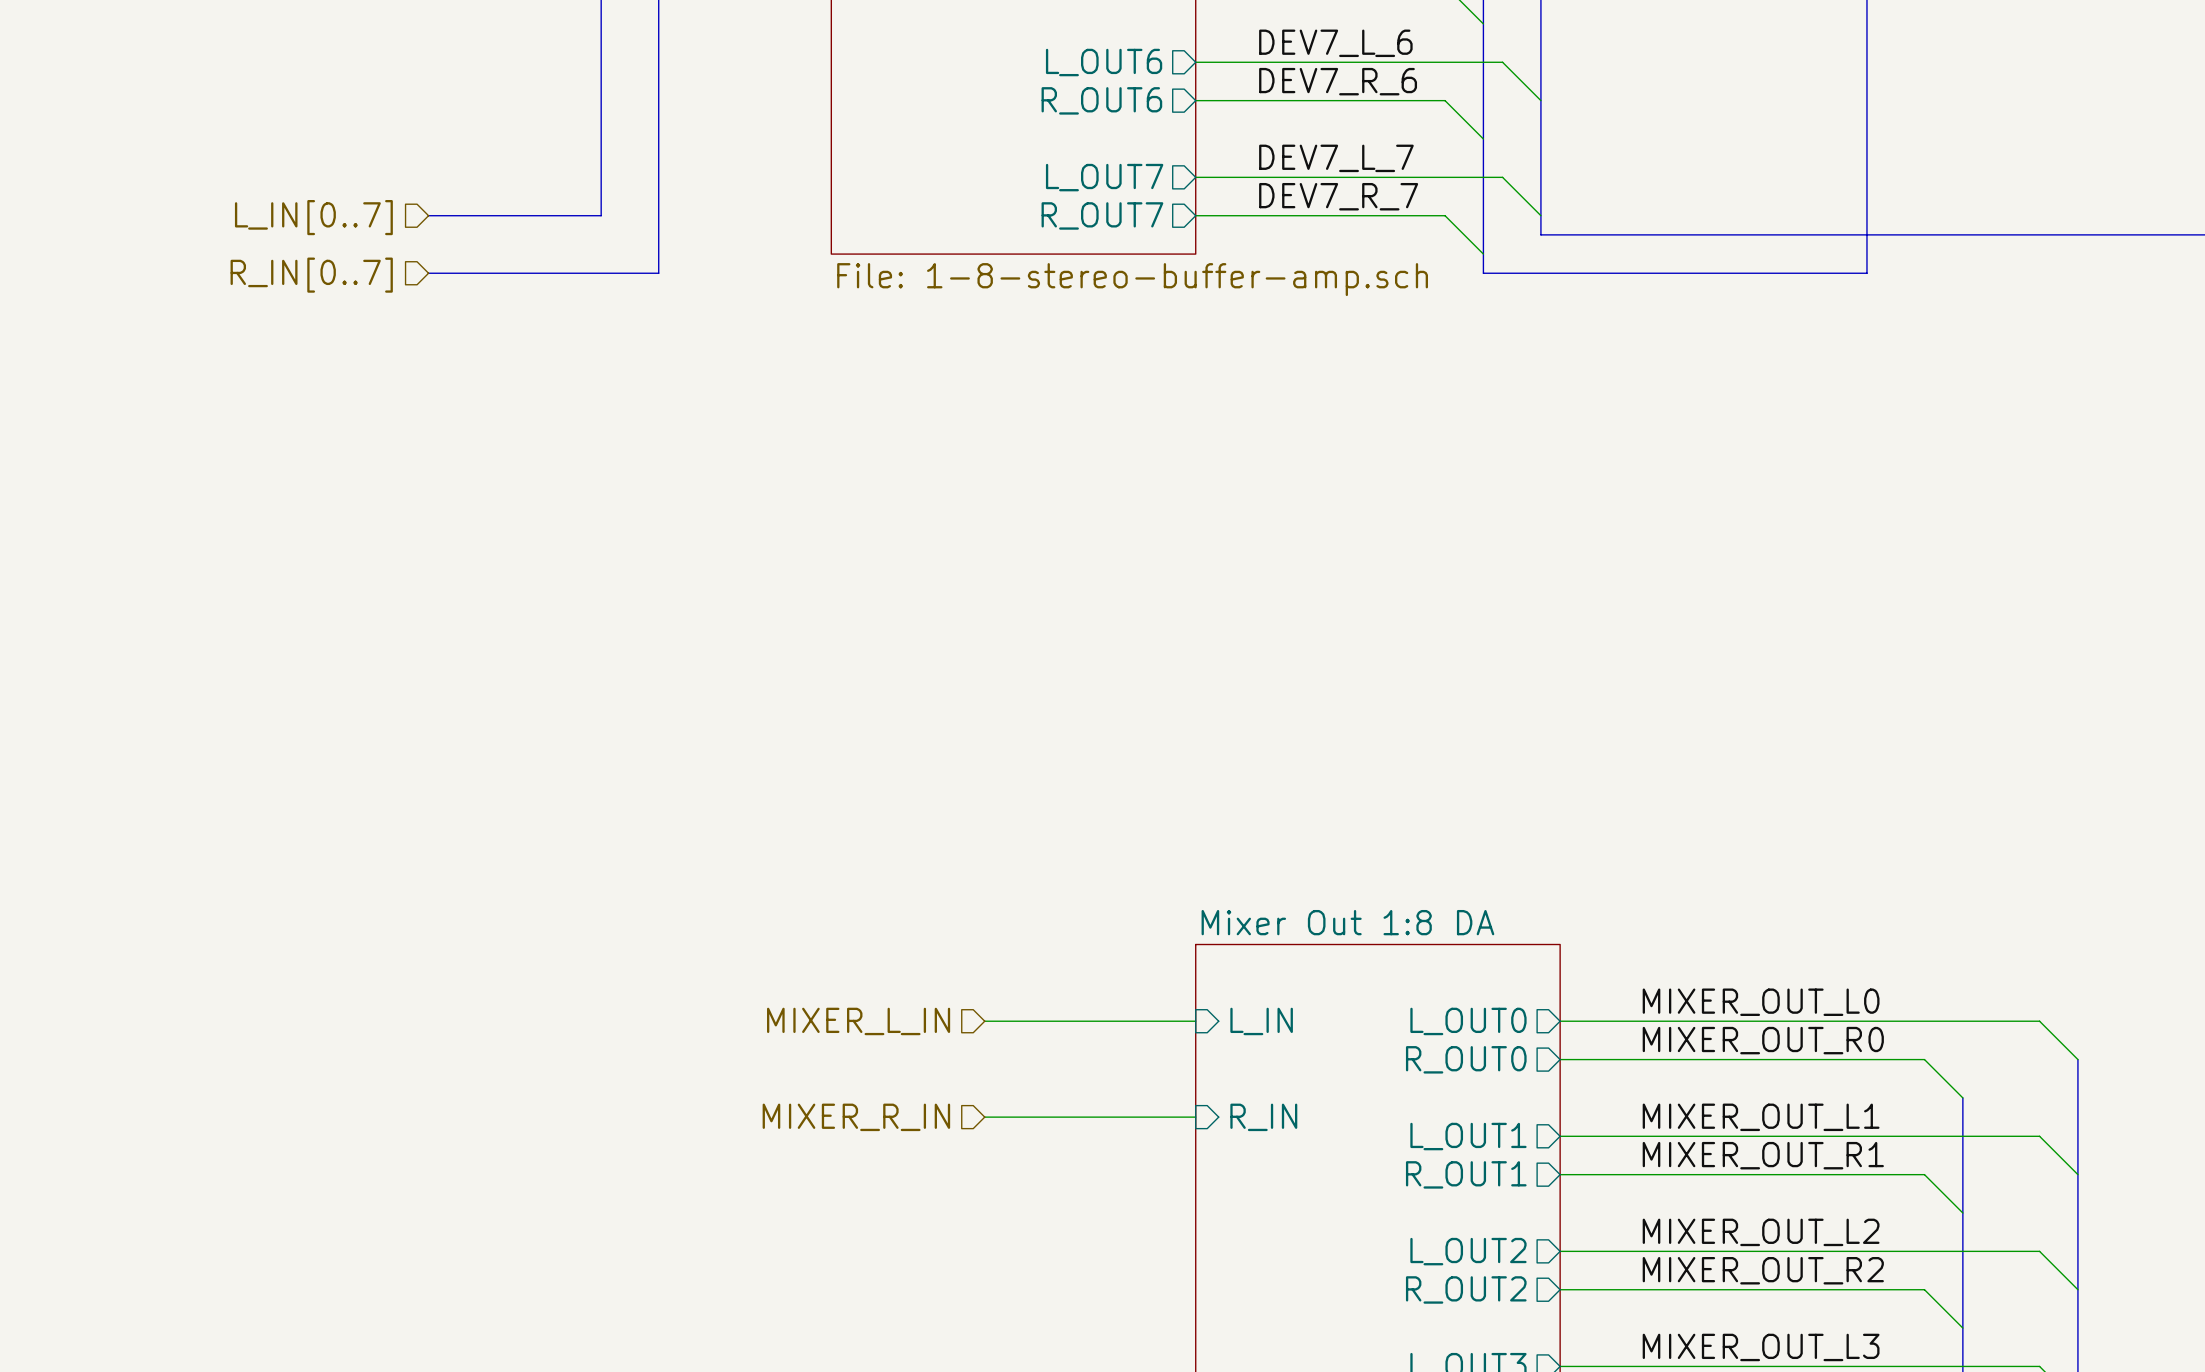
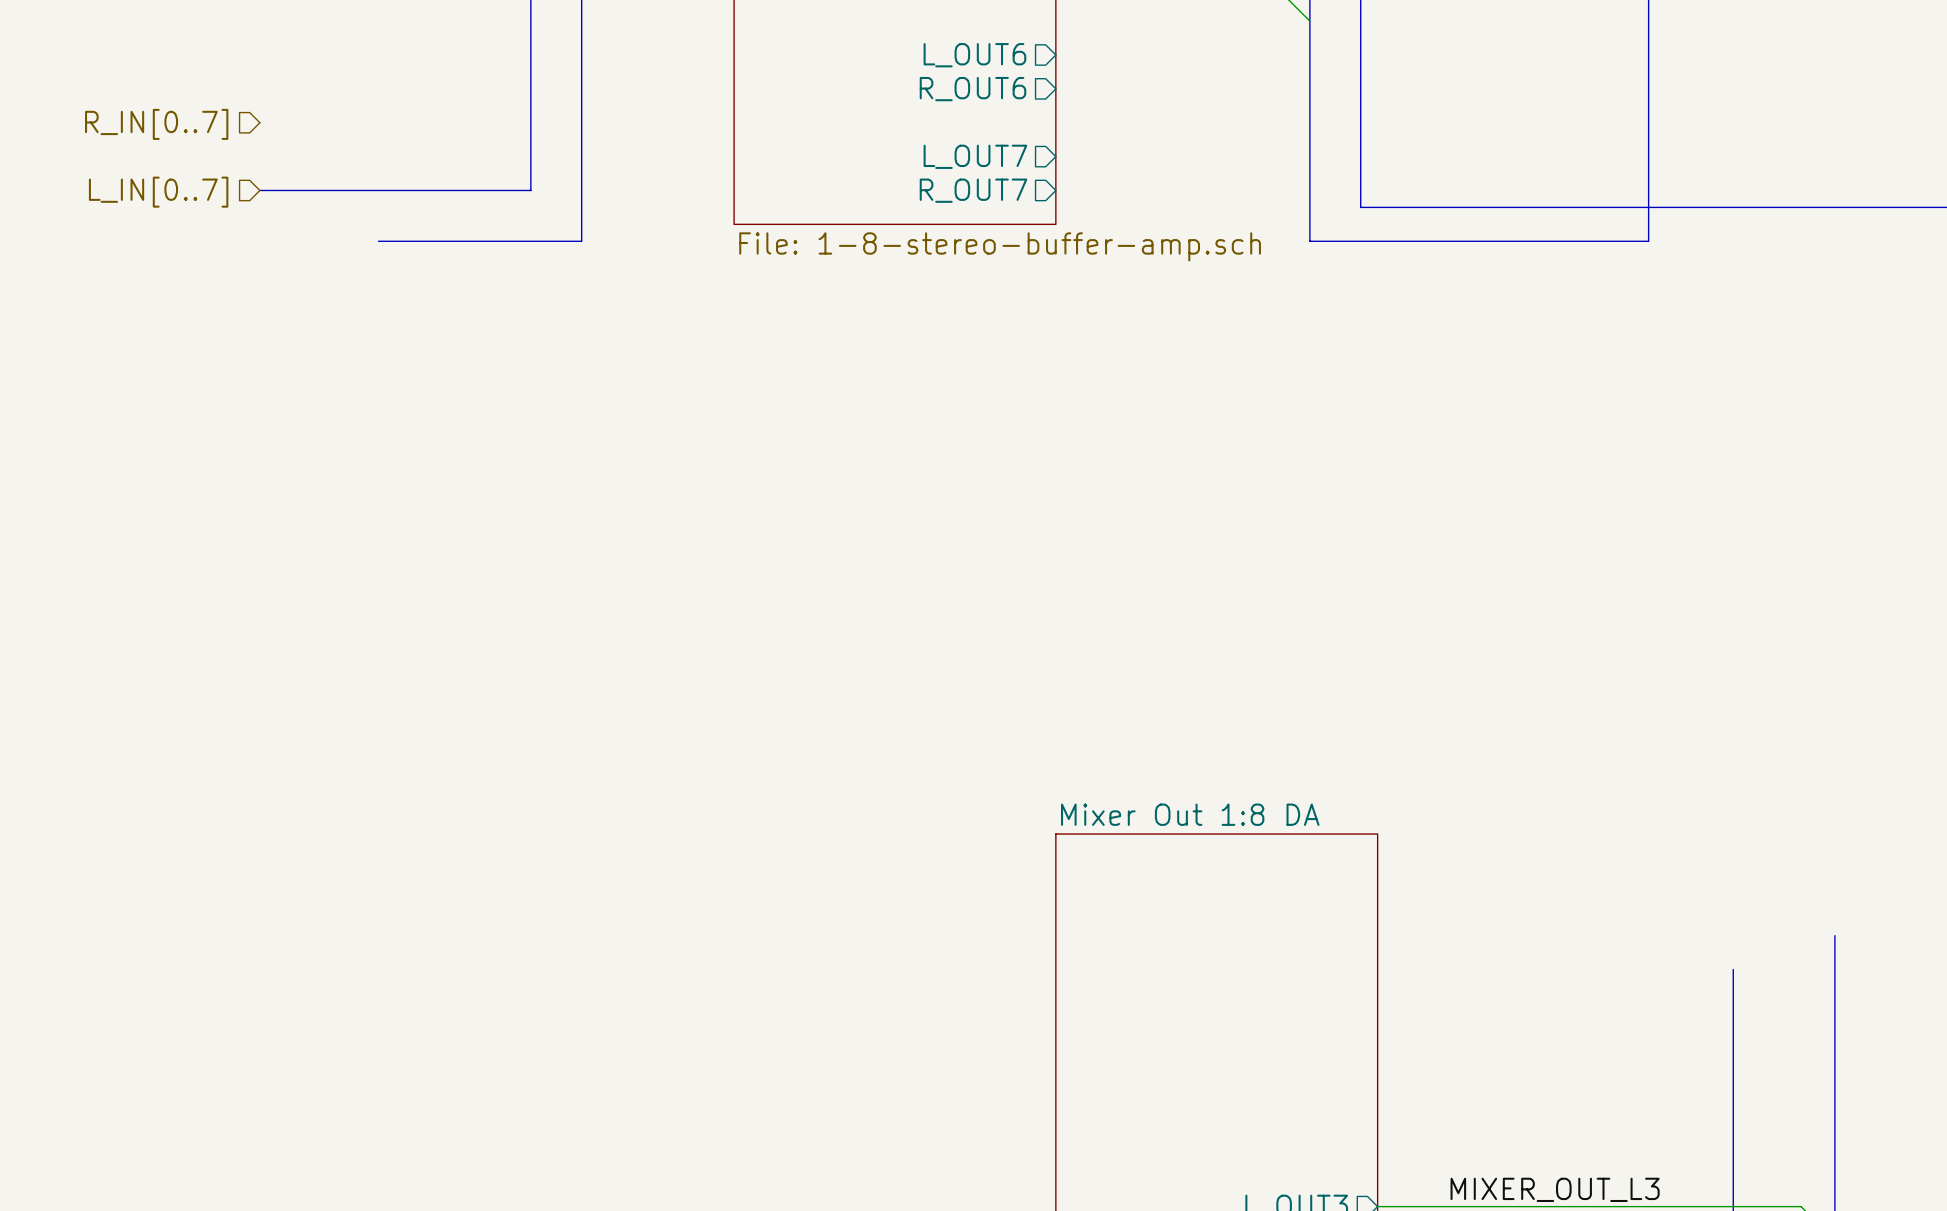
label: DEV7_L_6 (1335, 43) -> none
wire: (1195, 62) (1502, 62) (1540, 100) -> none
label: DEV7_R_6 (1338, 81) -> none
wire: (1195, 100) (1445, 100) (1483, 138) -> none
label: DEV7_L_7 (1336, 158) -> none
wire: (1195, 177) (1502, 177) (1540, 215) -> none
label: DEV7_R_7 (1338, 196) -> none
bus: none -> (259, 190) (378, 190)
wire: (1195, 215) (1445, 215) (1483, 254) -> none
hierarchical label position: L_IN[0..7] (313, 217) -> L_IN[0..7] (158, 192)
hierarchical label position: R_IN[0..7] (311, 275) -> R_IN[0..7] (156, 124)
label: MIXER_OUT_L0 (1761, 1002) -> none
hierarchical label: MIXER_L_IN (858, 1021) -> none
wire: (984, 1021) (1195, 1021) -> none
sheet pin: L_IN (1261, 1021) -> none
sheet pin: L_OUT0 (1468, 1021) -> none
wire: (1560, 1021) (2039, 1021) (2077, 1059) -> none
label: MIXER_OUT_R0 (1763, 1040) -> none
sheet pin: R_OUT0 (1466, 1059) -> none
wire: (1560, 1059) (1924, 1059) (1962, 1097) -> none
hierarchical label: MIXER_R_IN (856, 1117) -> none
wire: (984, 1117) (1195, 1117) -> none
sheet pin: R_IN (1263, 1117) -> none
label: MIXER_OUT_L1 (1761, 1117) -> none
sheet pin: L_OUT1 (1468, 1136) -> none
wire: (1560, 1136) (2039, 1136) (2077, 1174) -> none
label: MIXER_OUT_R1 (1763, 1155) -> none
sheet pin: R_OUT1 (1466, 1174) -> none
wire: (1560, 1174) (1924, 1174) (1962, 1213) -> none
label: MIXER_OUT_L2 (1761, 1232) -> none
sheet pin: L_OUT2 (1468, 1251) -> none
wire: (1560, 1251) (2039, 1251) (2077, 1289) -> none
label: MIXER_OUT_R2 (1763, 1270) -> none
sheet pin: R_OUT2 (1466, 1289) -> none
wire: (1560, 1289) (1924, 1289) (1962, 1328) -> none

